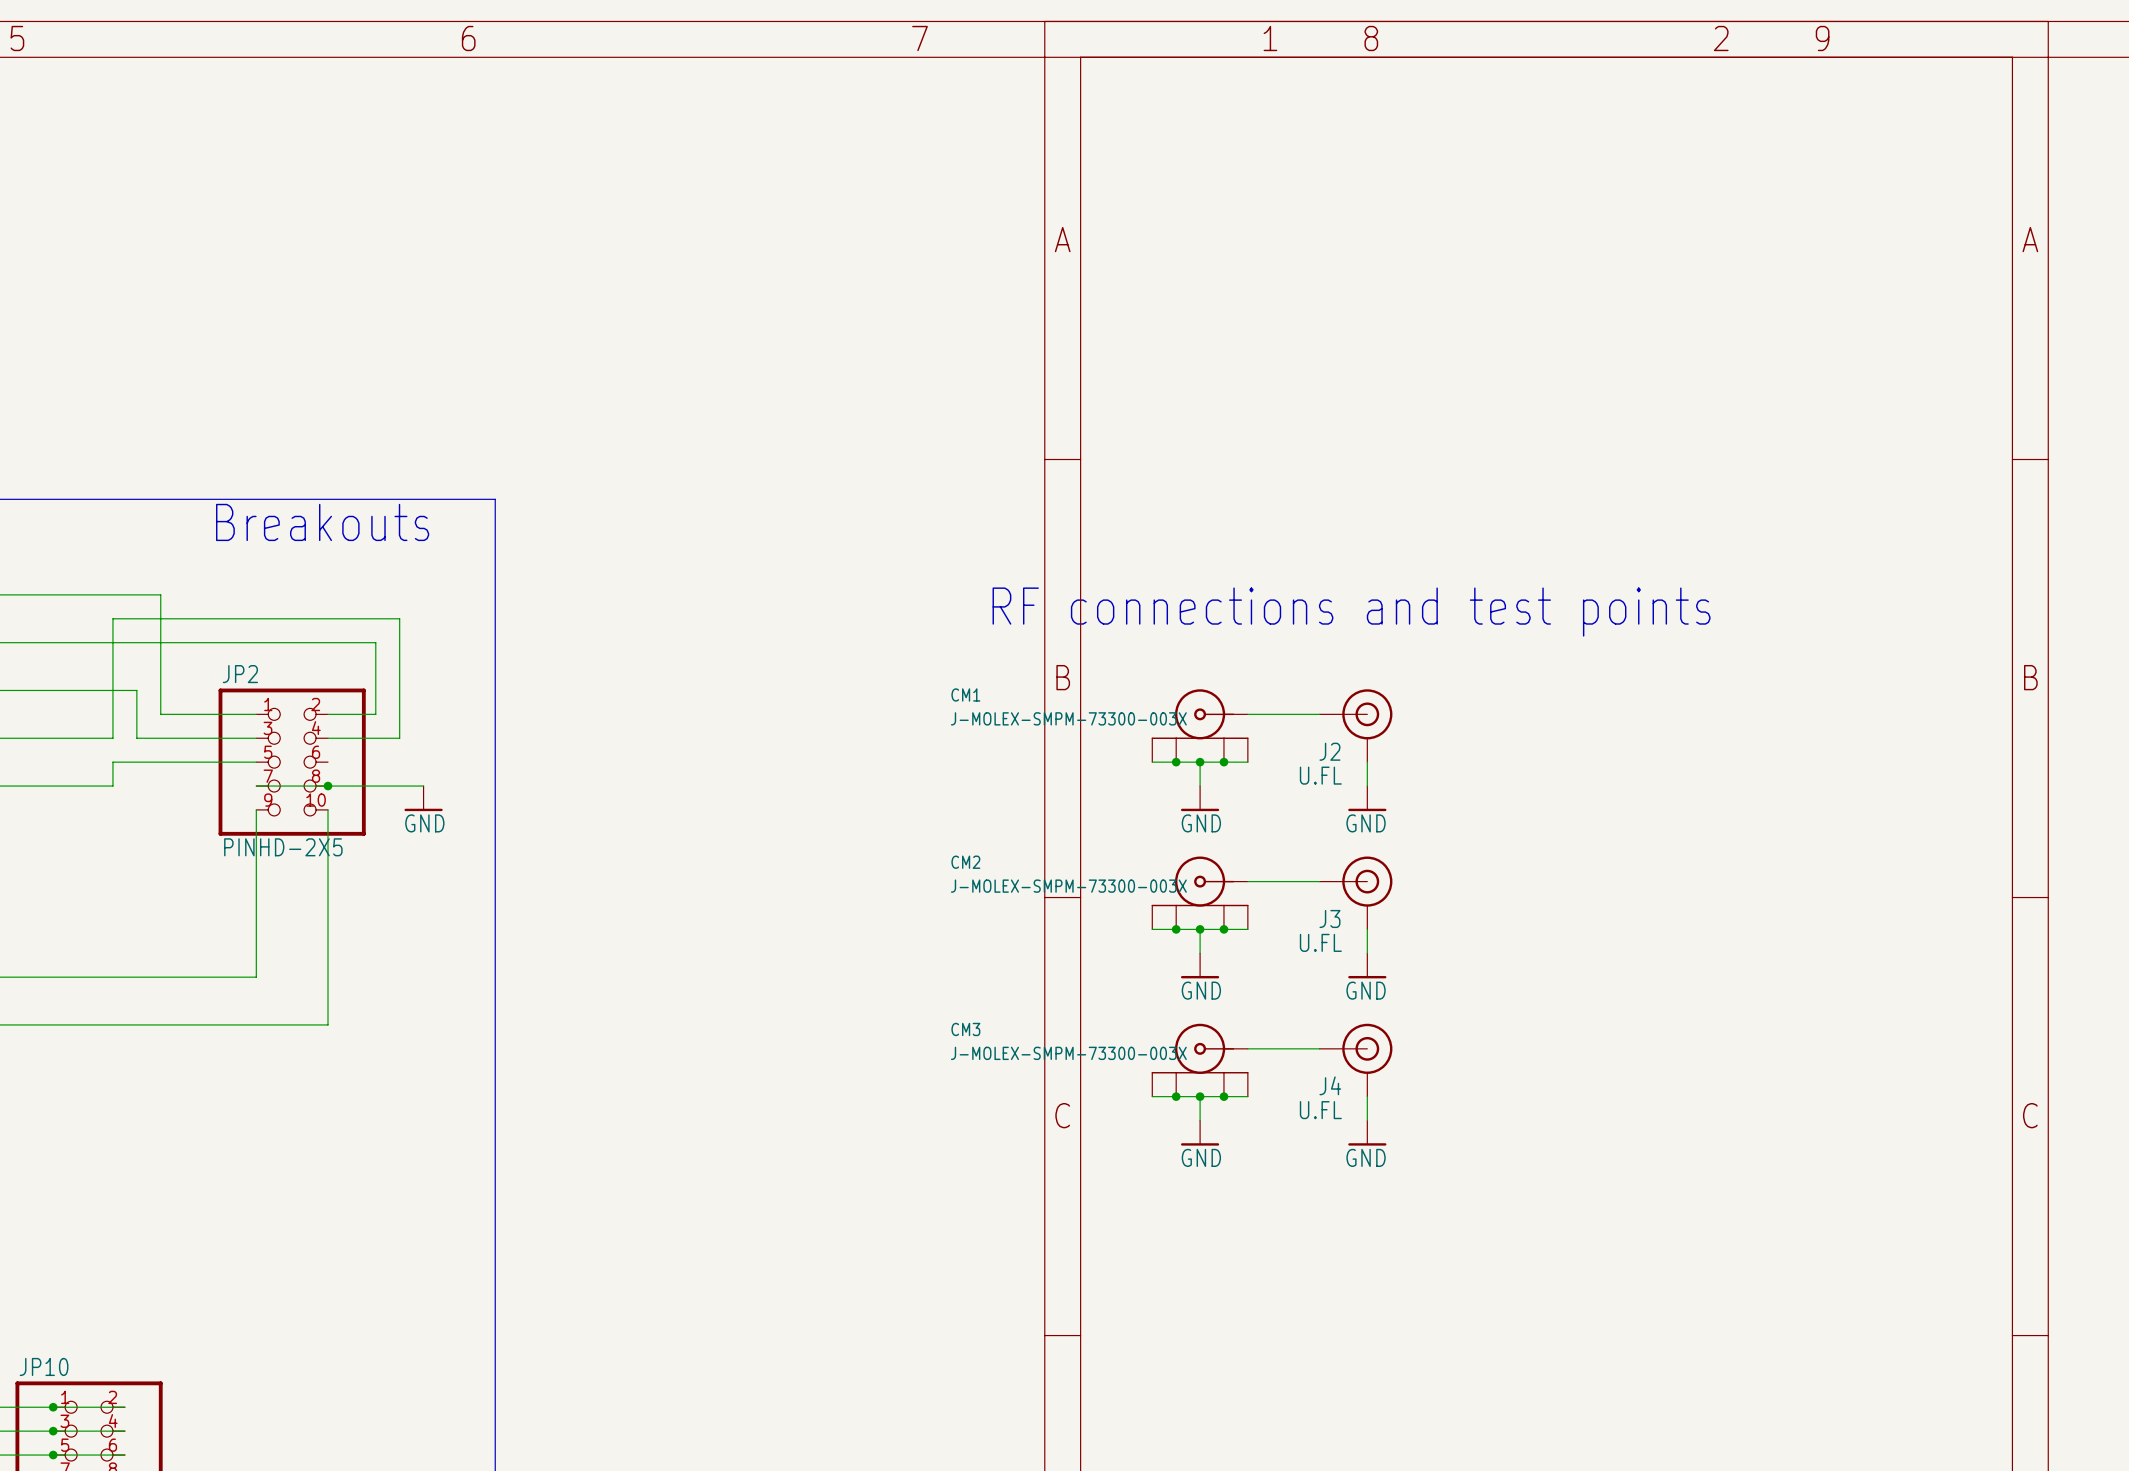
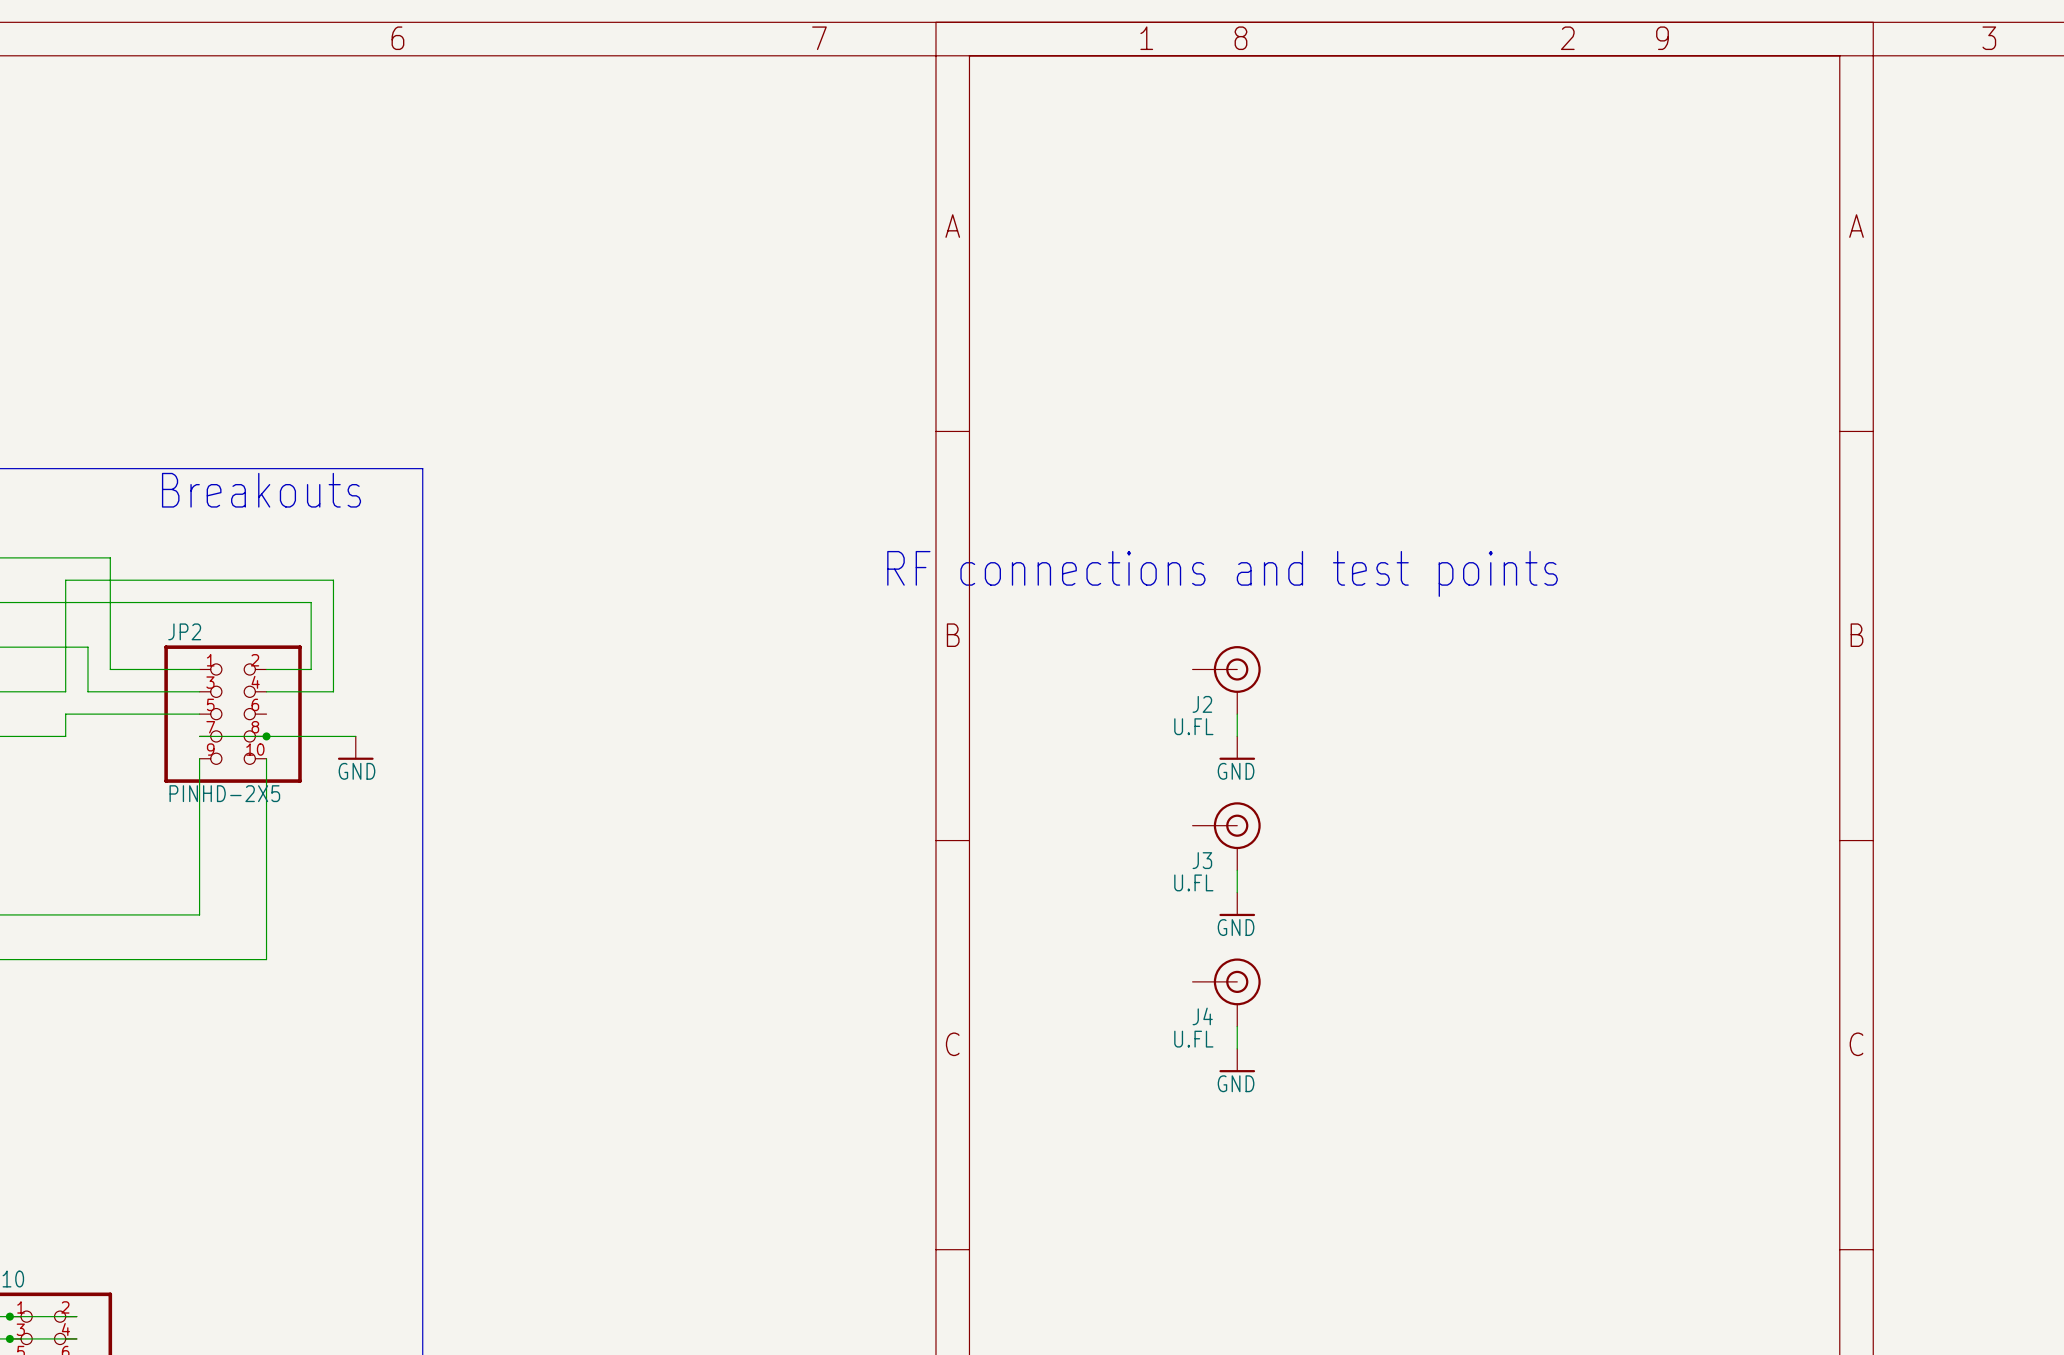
wire: (1247, 714) (1319, 714) -> none
CM1: J-MOLEX-SMPM-73300-003X (1200, 725) -> none
wire: (1152, 762) (1247, 762) -> none
junction: (1176, 762) -> none
wire: (1200, 762) (1200, 786) -> none
junction: (1200, 762) -> none
junction: (1223, 762) -> none
power symbol: GND (1200, 798) -> none
wire: (1247, 881) (1319, 881) -> none
CM2: J-MOLEX-SMPM-73300-003X (1200, 892) -> none
wire: (1152, 929) (1247, 929) -> none
junction: (1176, 929) -> none
wire: (1200, 929) (1200, 953) -> none
junction: (1200, 929) -> none
junction: (1223, 929) -> none
power symbol: GND (1200, 965) -> none
wire: (1247, 1048) (1319, 1048) -> none
CM3: J-MOLEX-SMPM-73300-003X (1200, 1060) -> none
wire: (1152, 1096) (1247, 1096) -> none
junction: (1176, 1096) -> none
wire: (1200, 1096) (1200, 1120) -> none
junction: (1200, 1096) -> none
junction: (1223, 1096) -> none
power symbol: GND (1200, 1133) -> none

